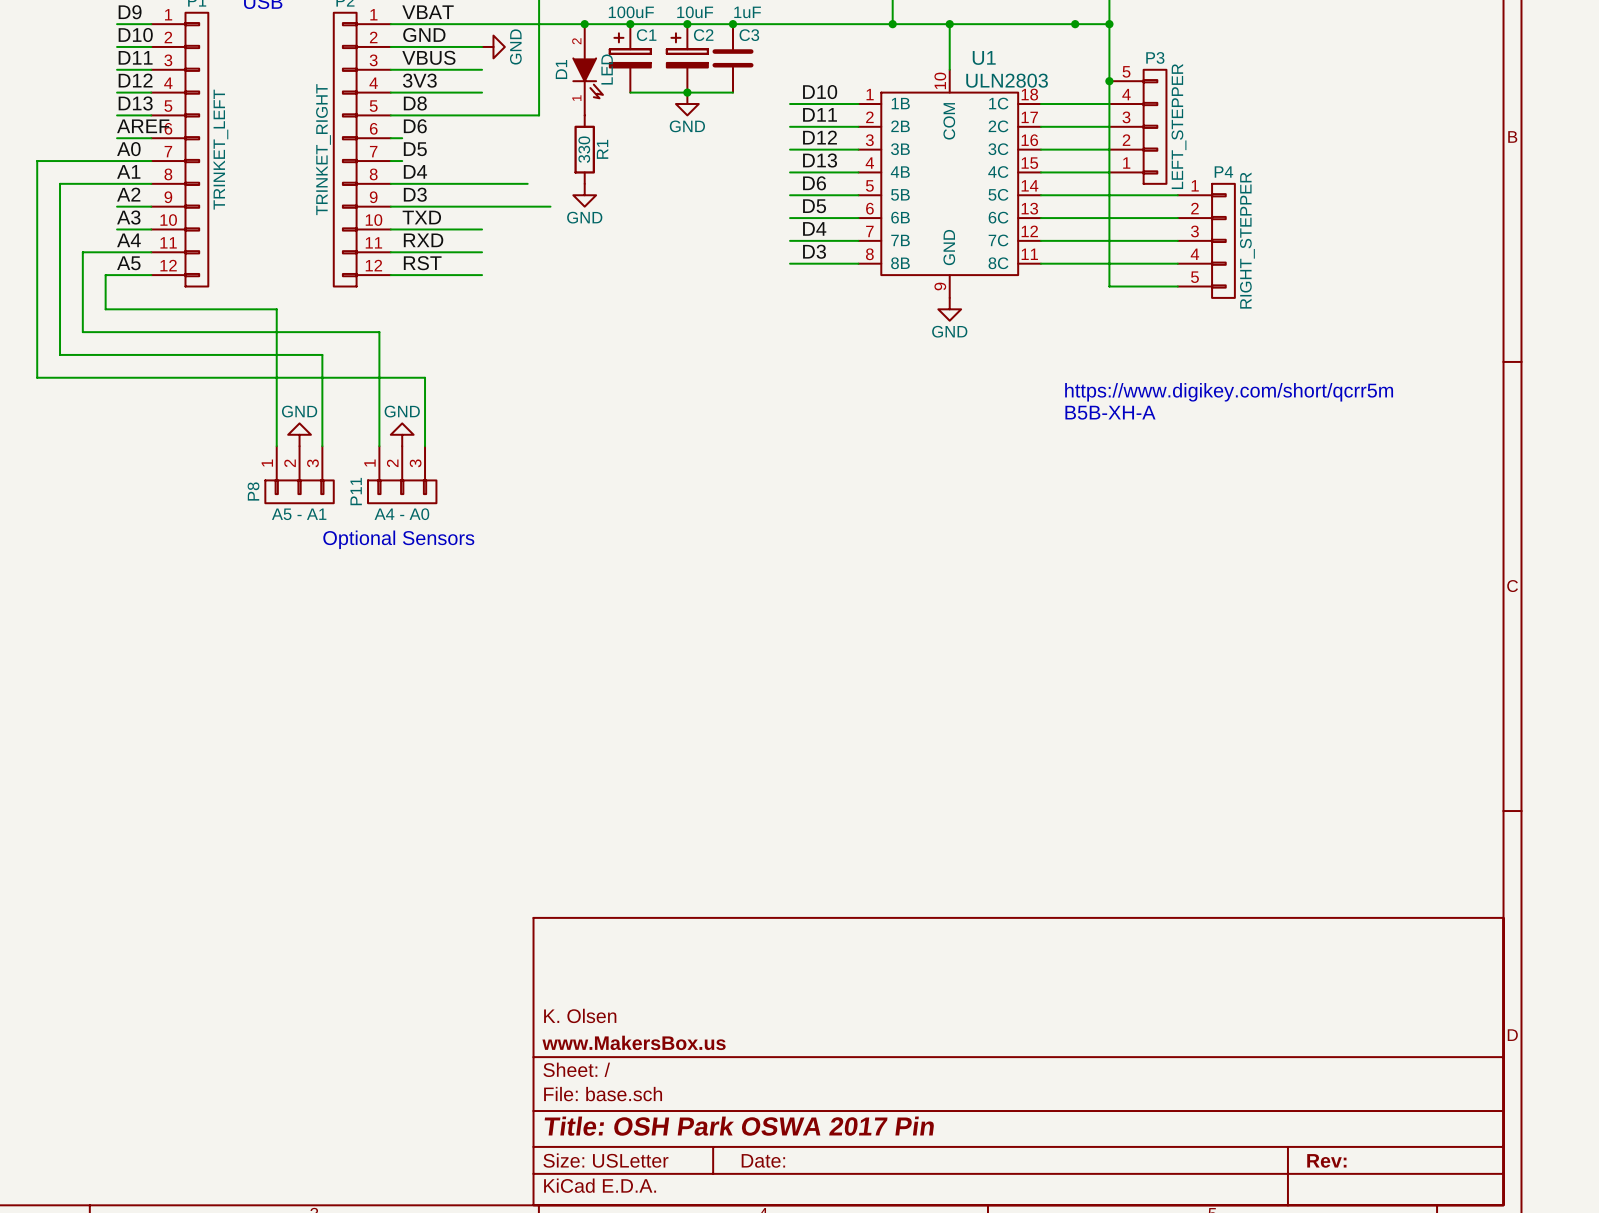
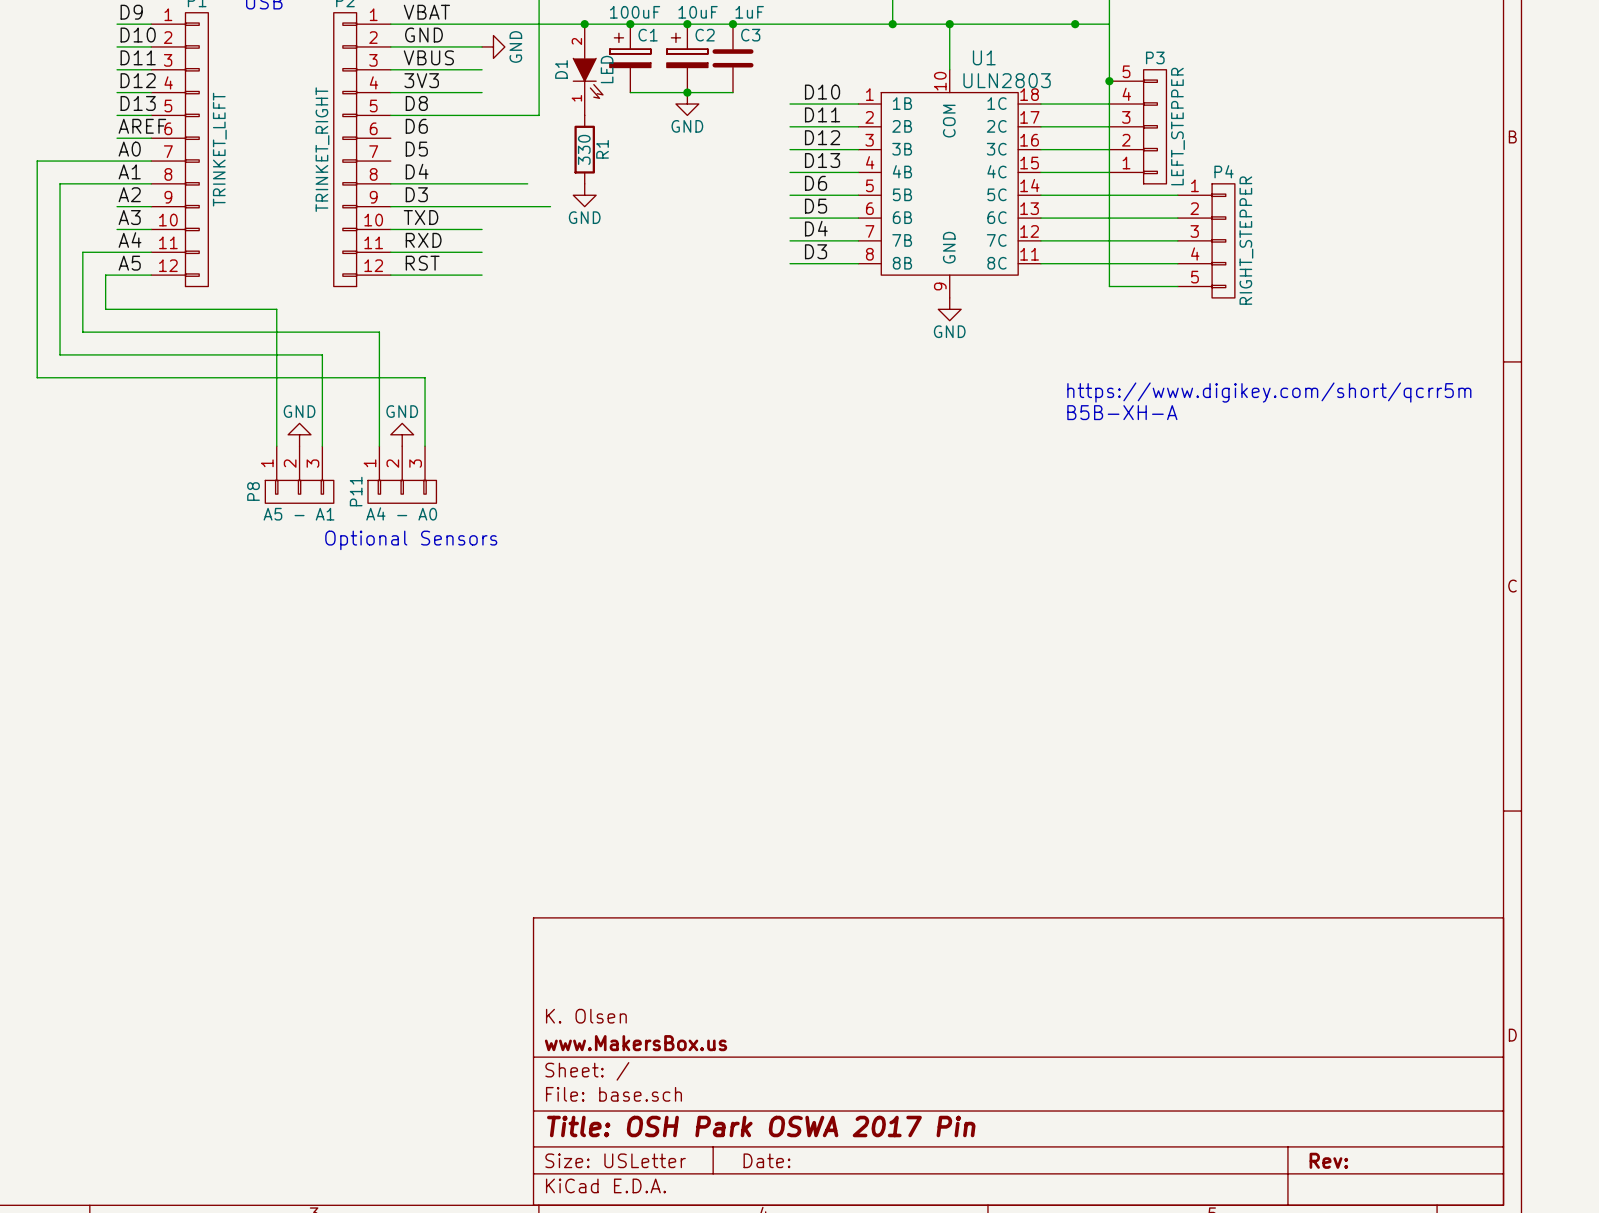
junction: (1109, 24) -> none
wire: (390, 138) (402, 138) -> none
wire: (390, 161) (402, 161) -> none

